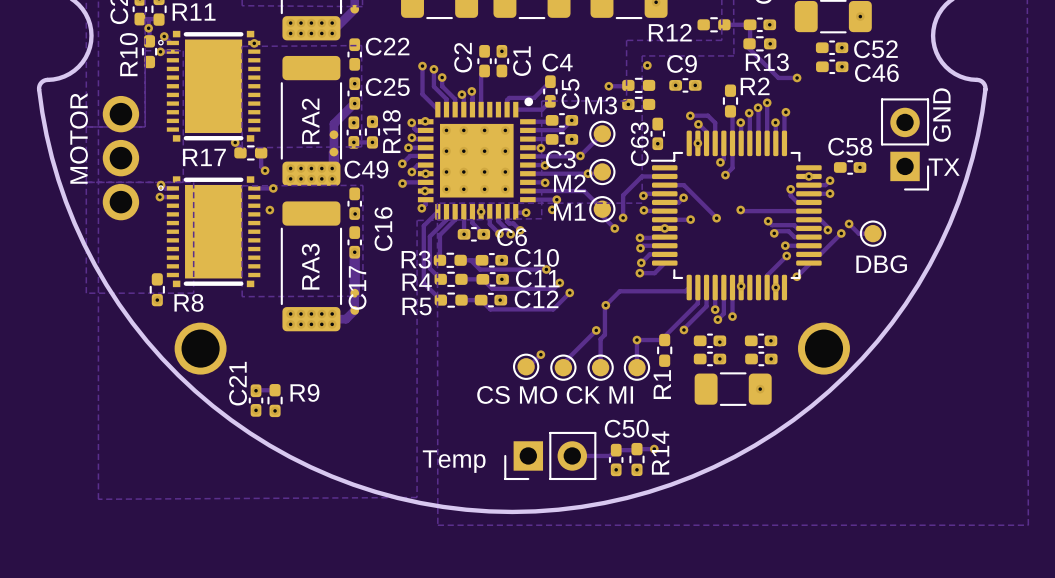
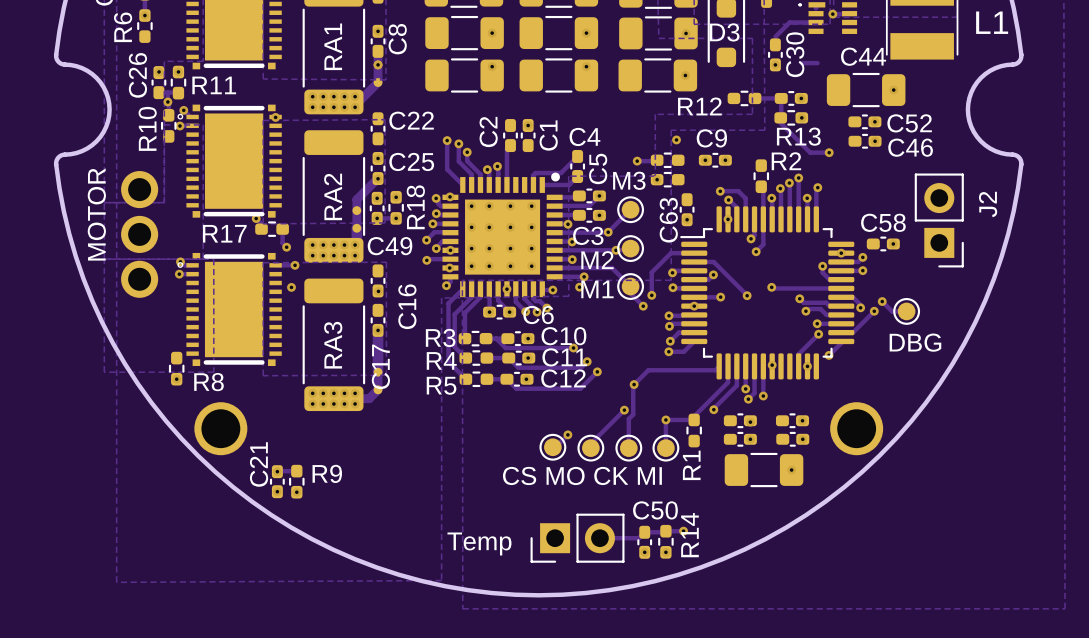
text: GND (941, 115) -> none
J2 name: none -> J2 (988, 204)
text: TX (944, 167) -> none

